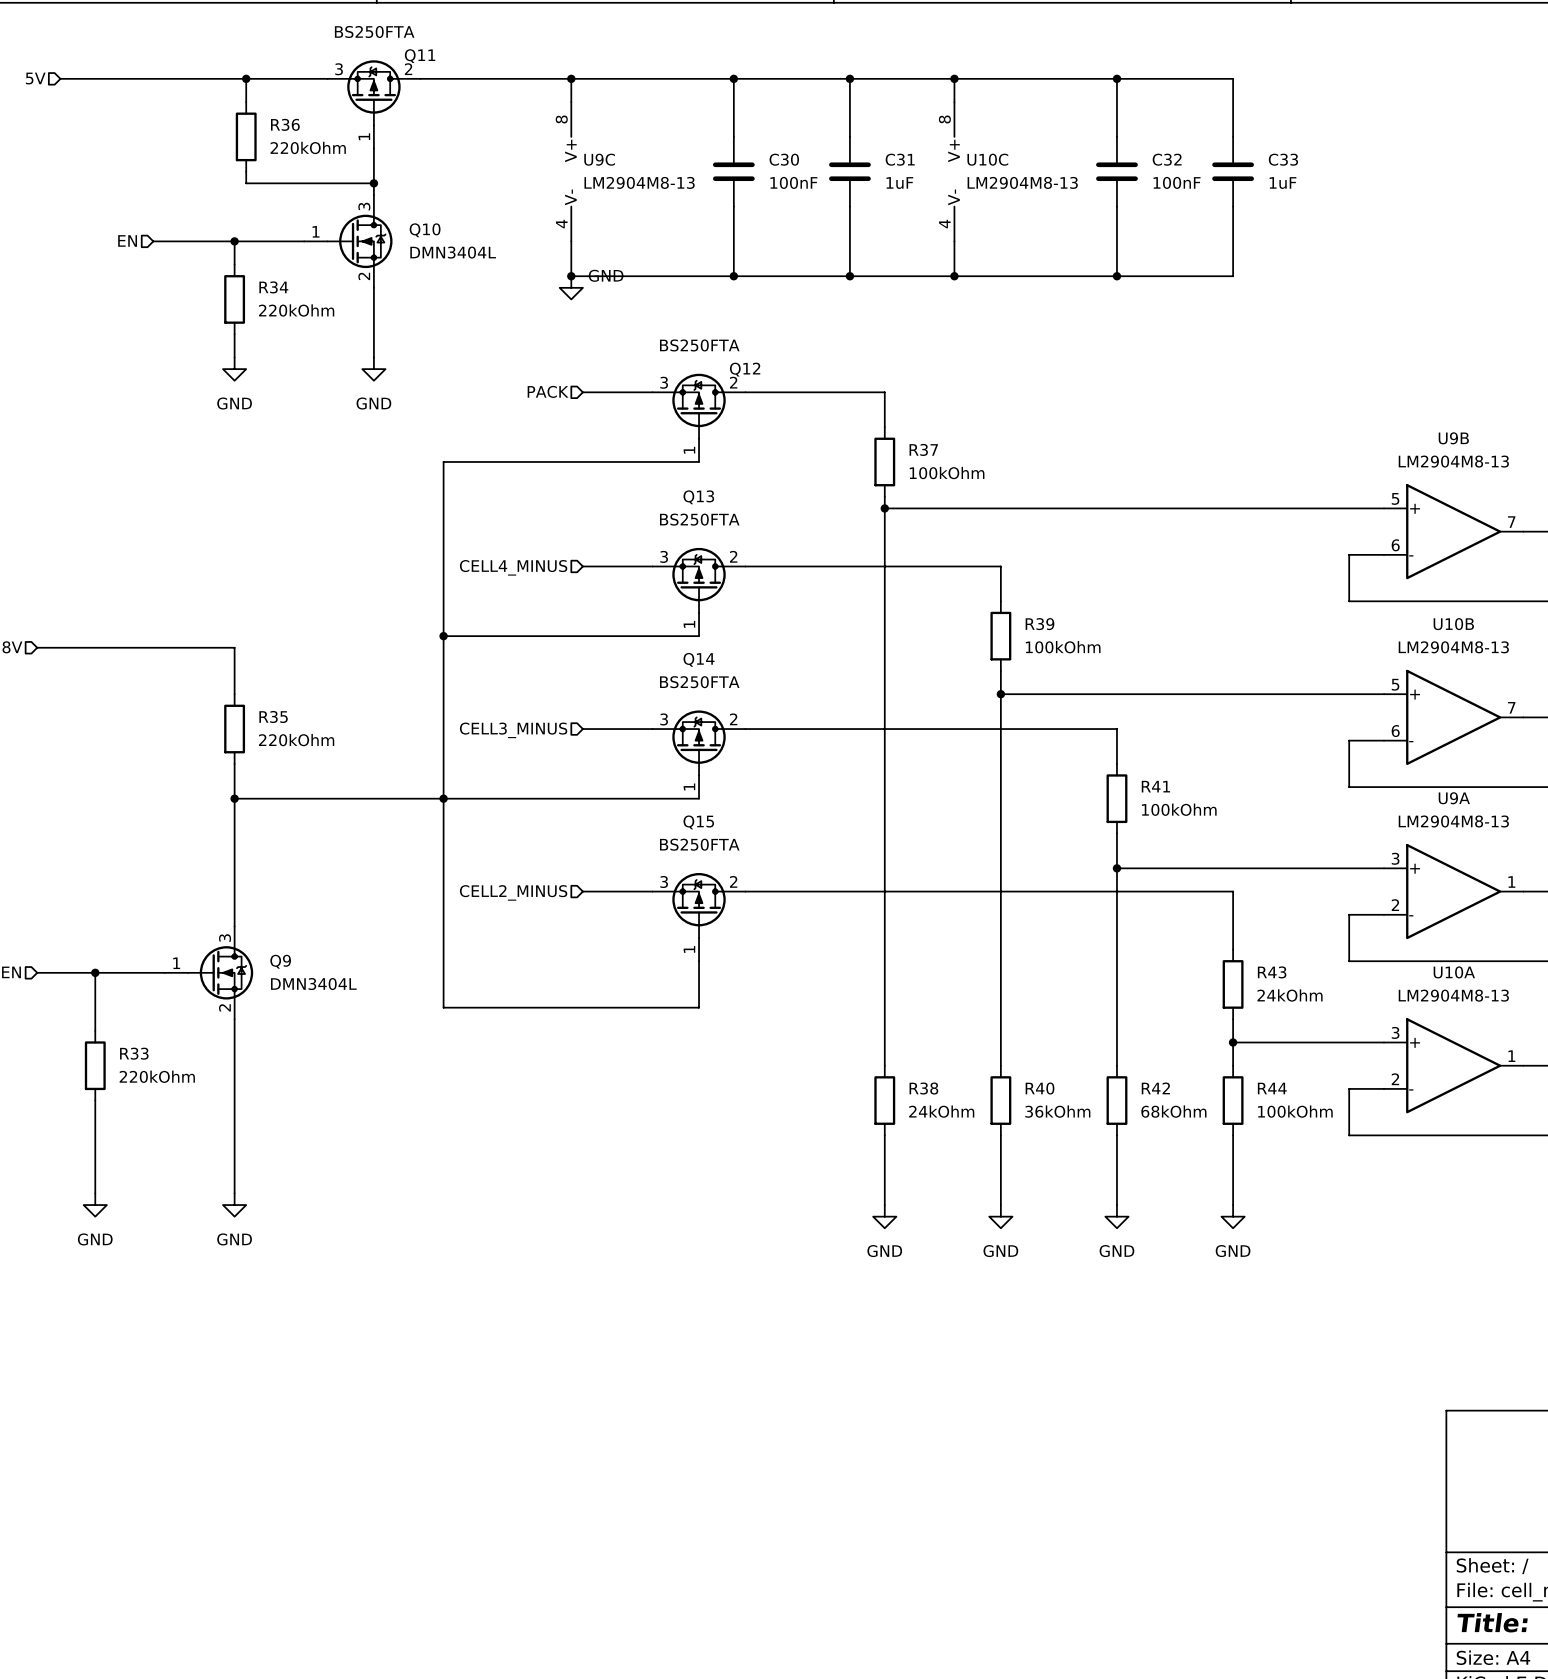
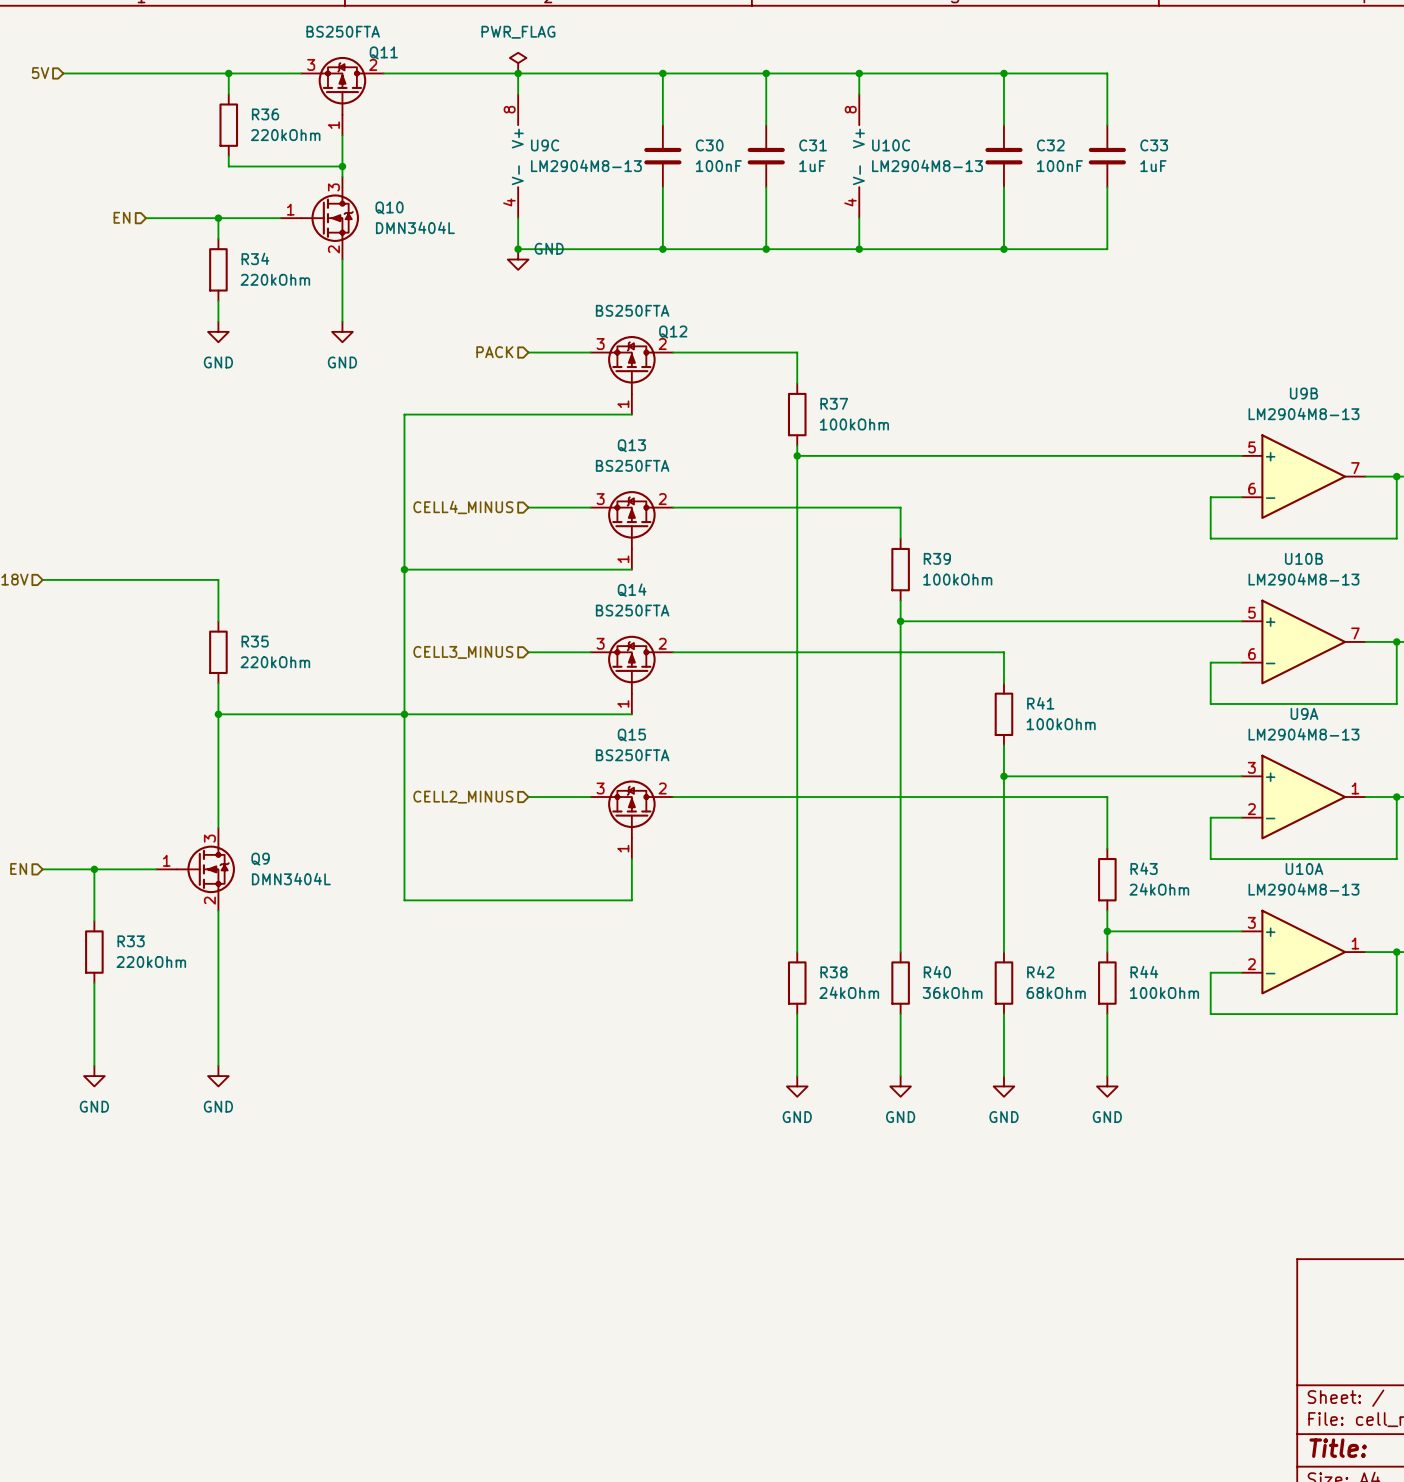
power symbol: none -> PWR_FLAG (518, 63)

